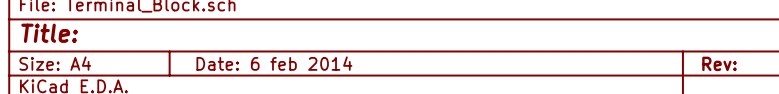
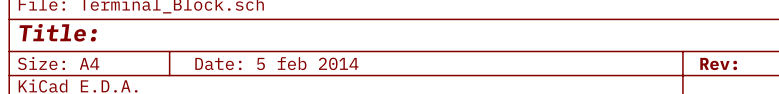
title block: Date: 6 feb 2014 (274, 63) -> Date: 5 feb 2014 (276, 63)

